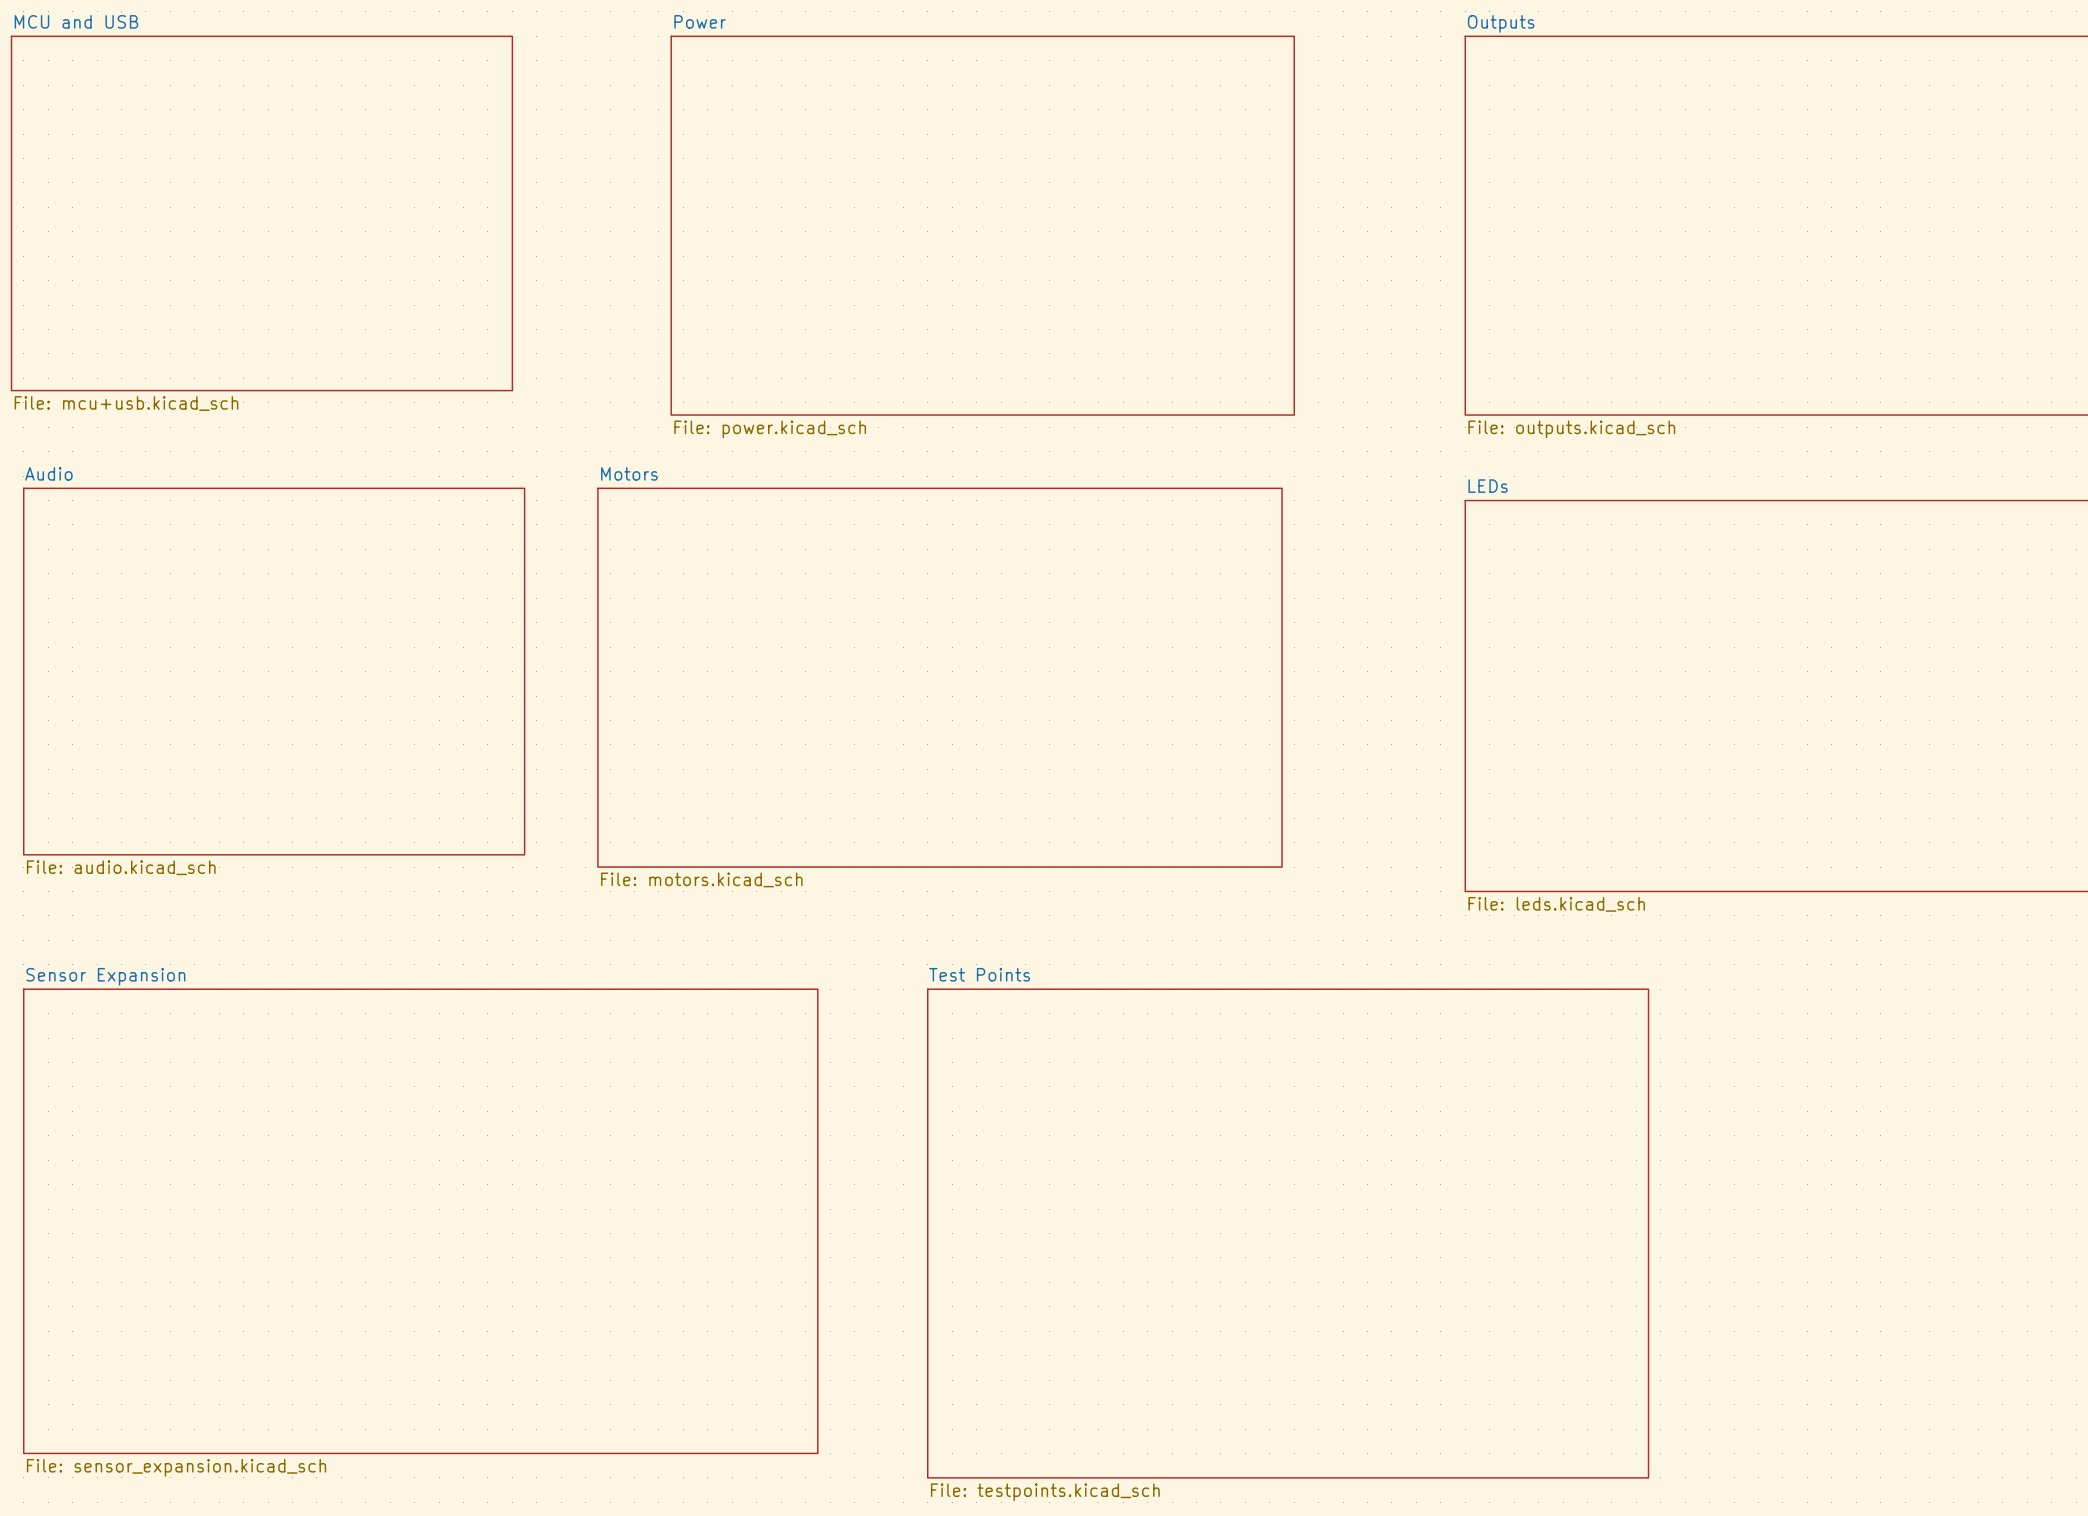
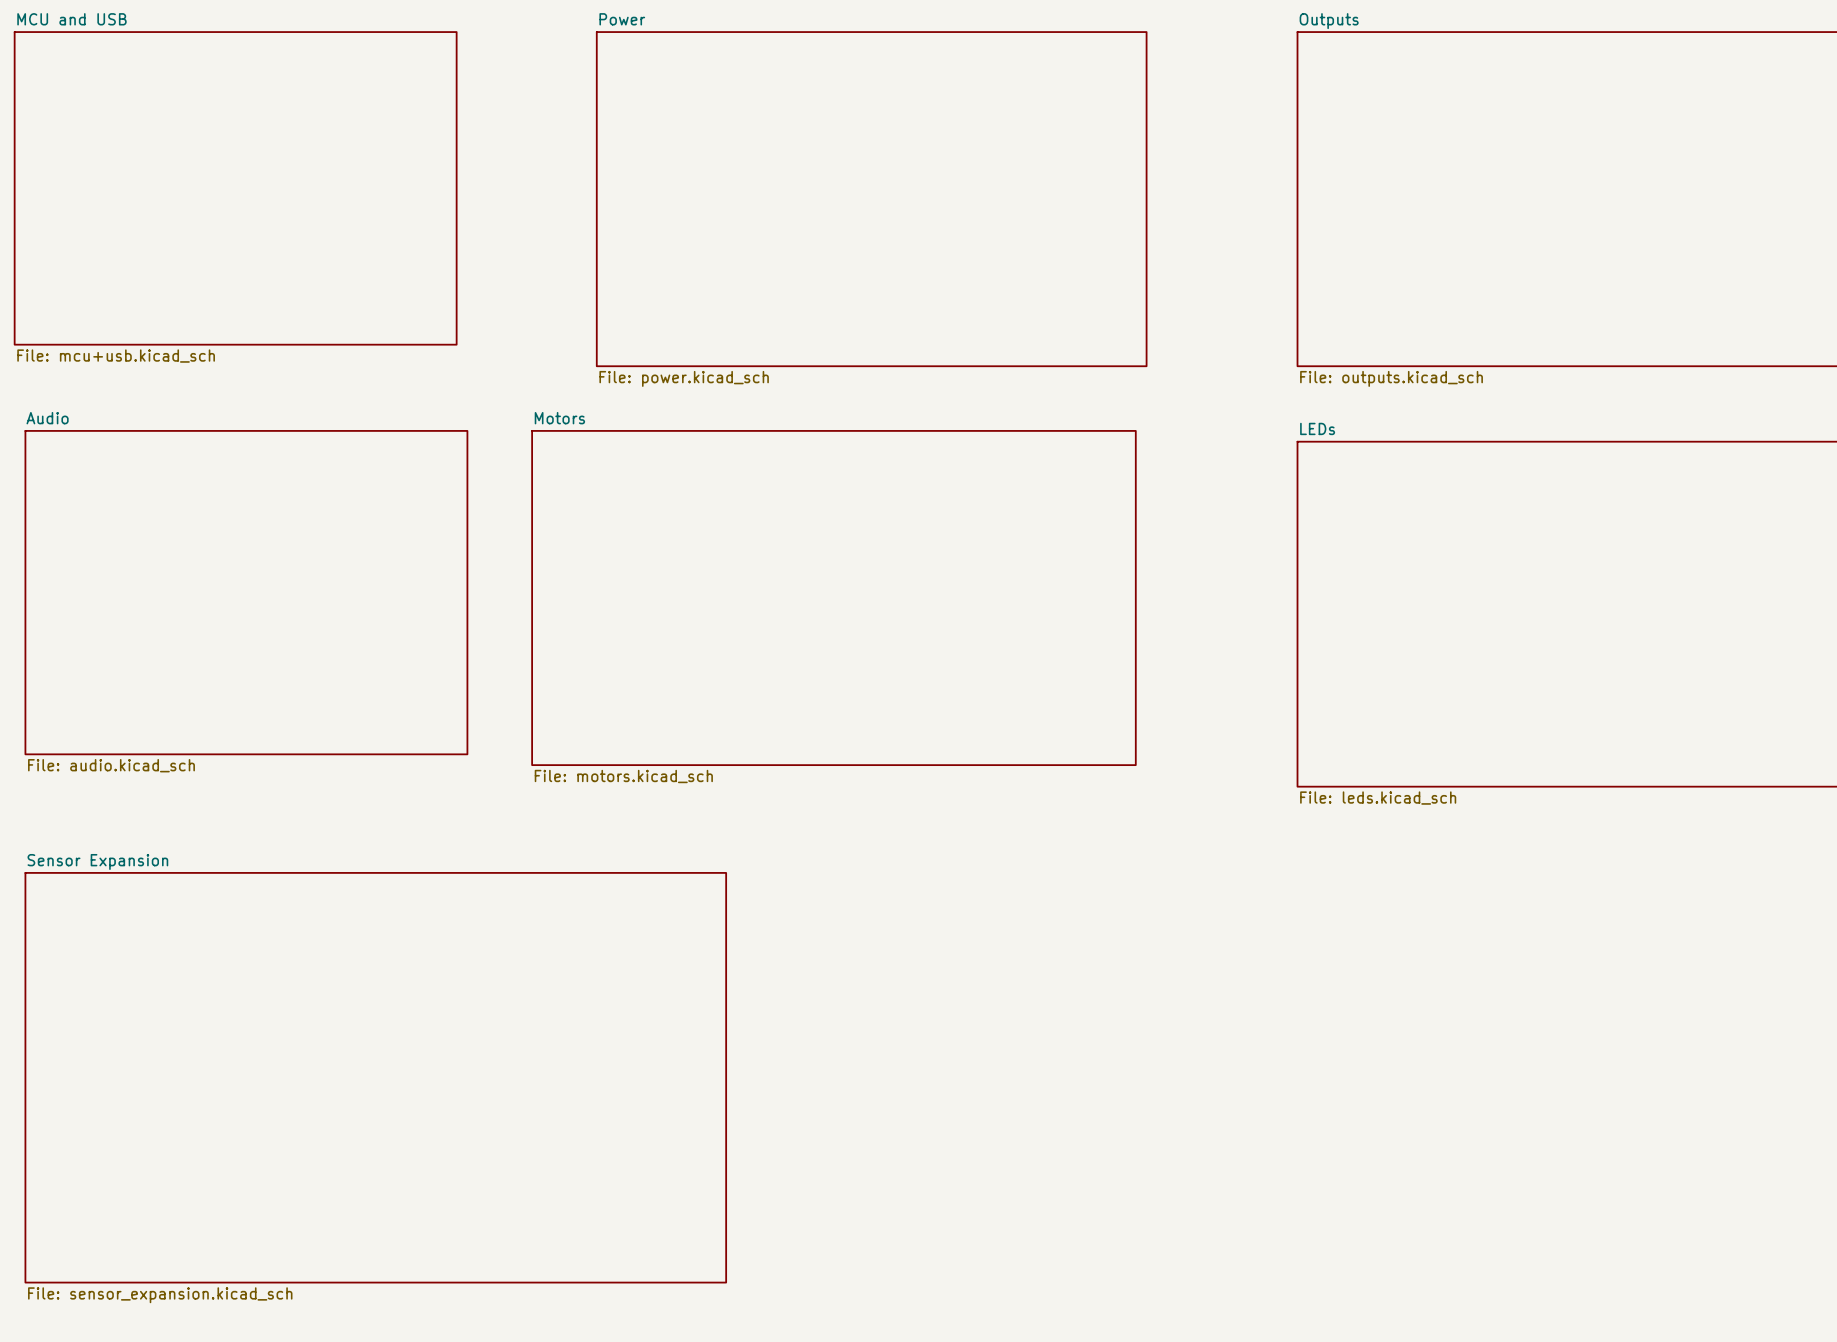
sheet Test Points: File: testpoints.kicad_sch (1288, 1233) -> none

